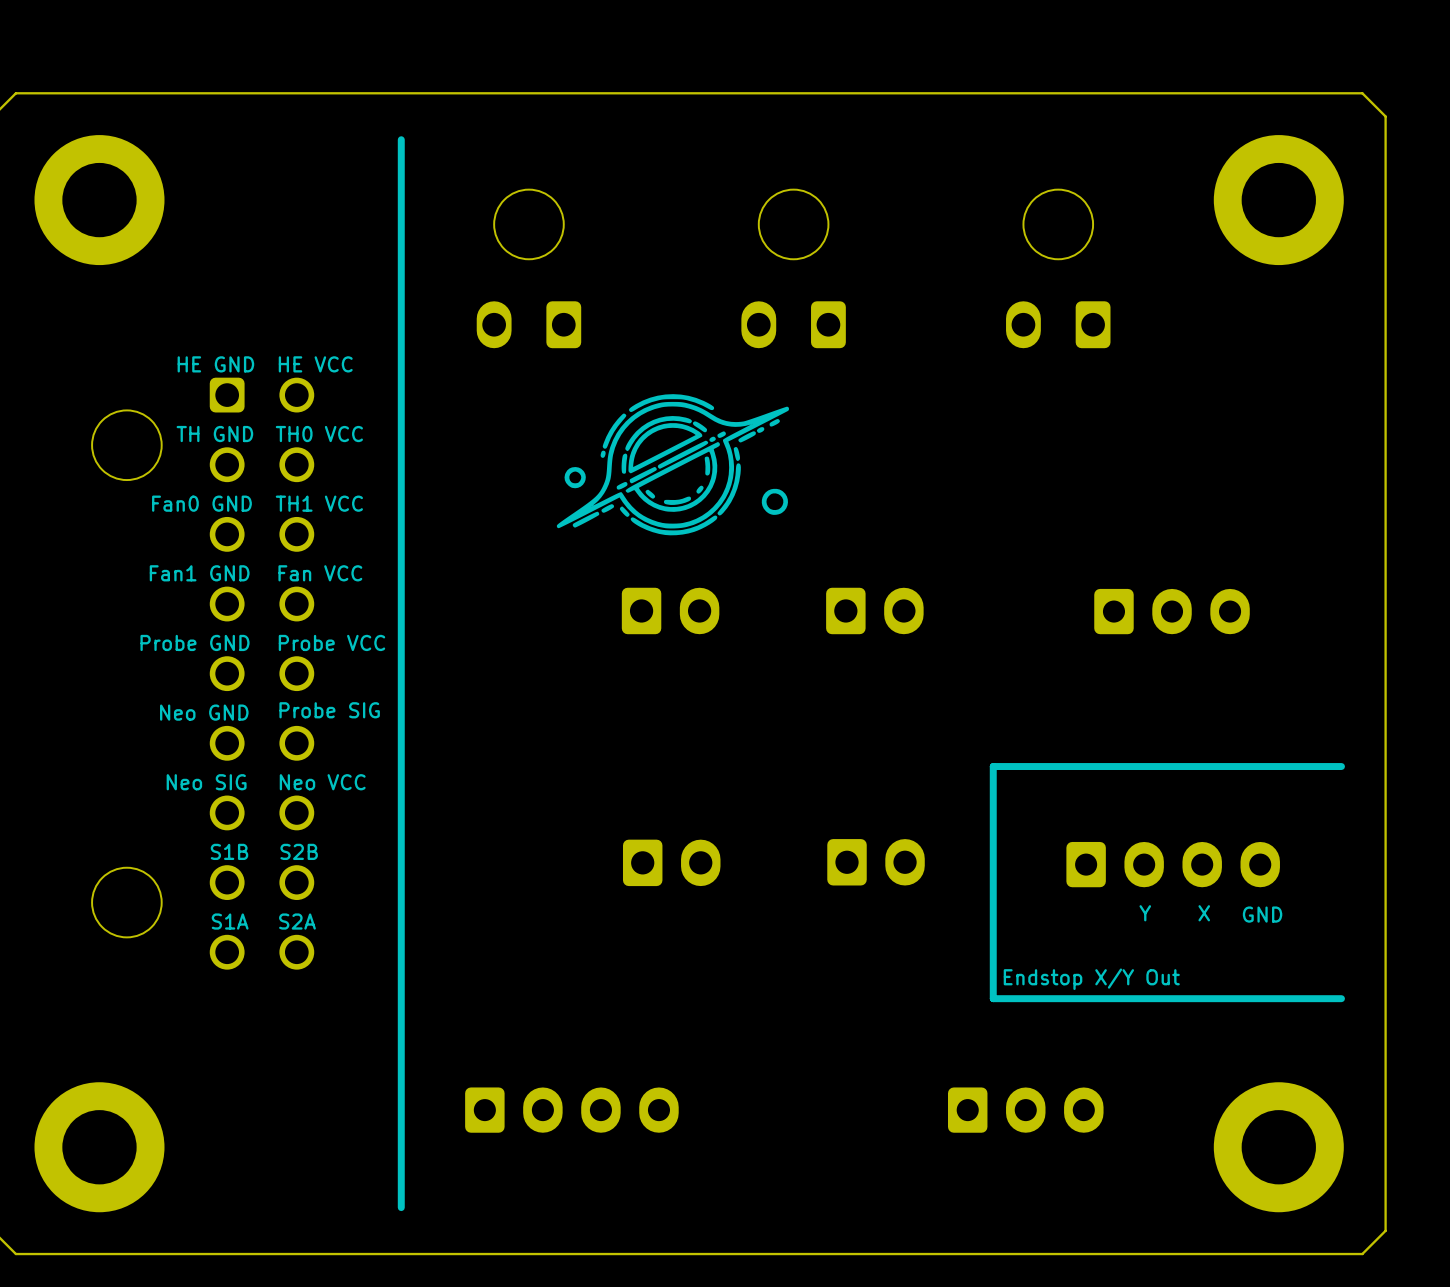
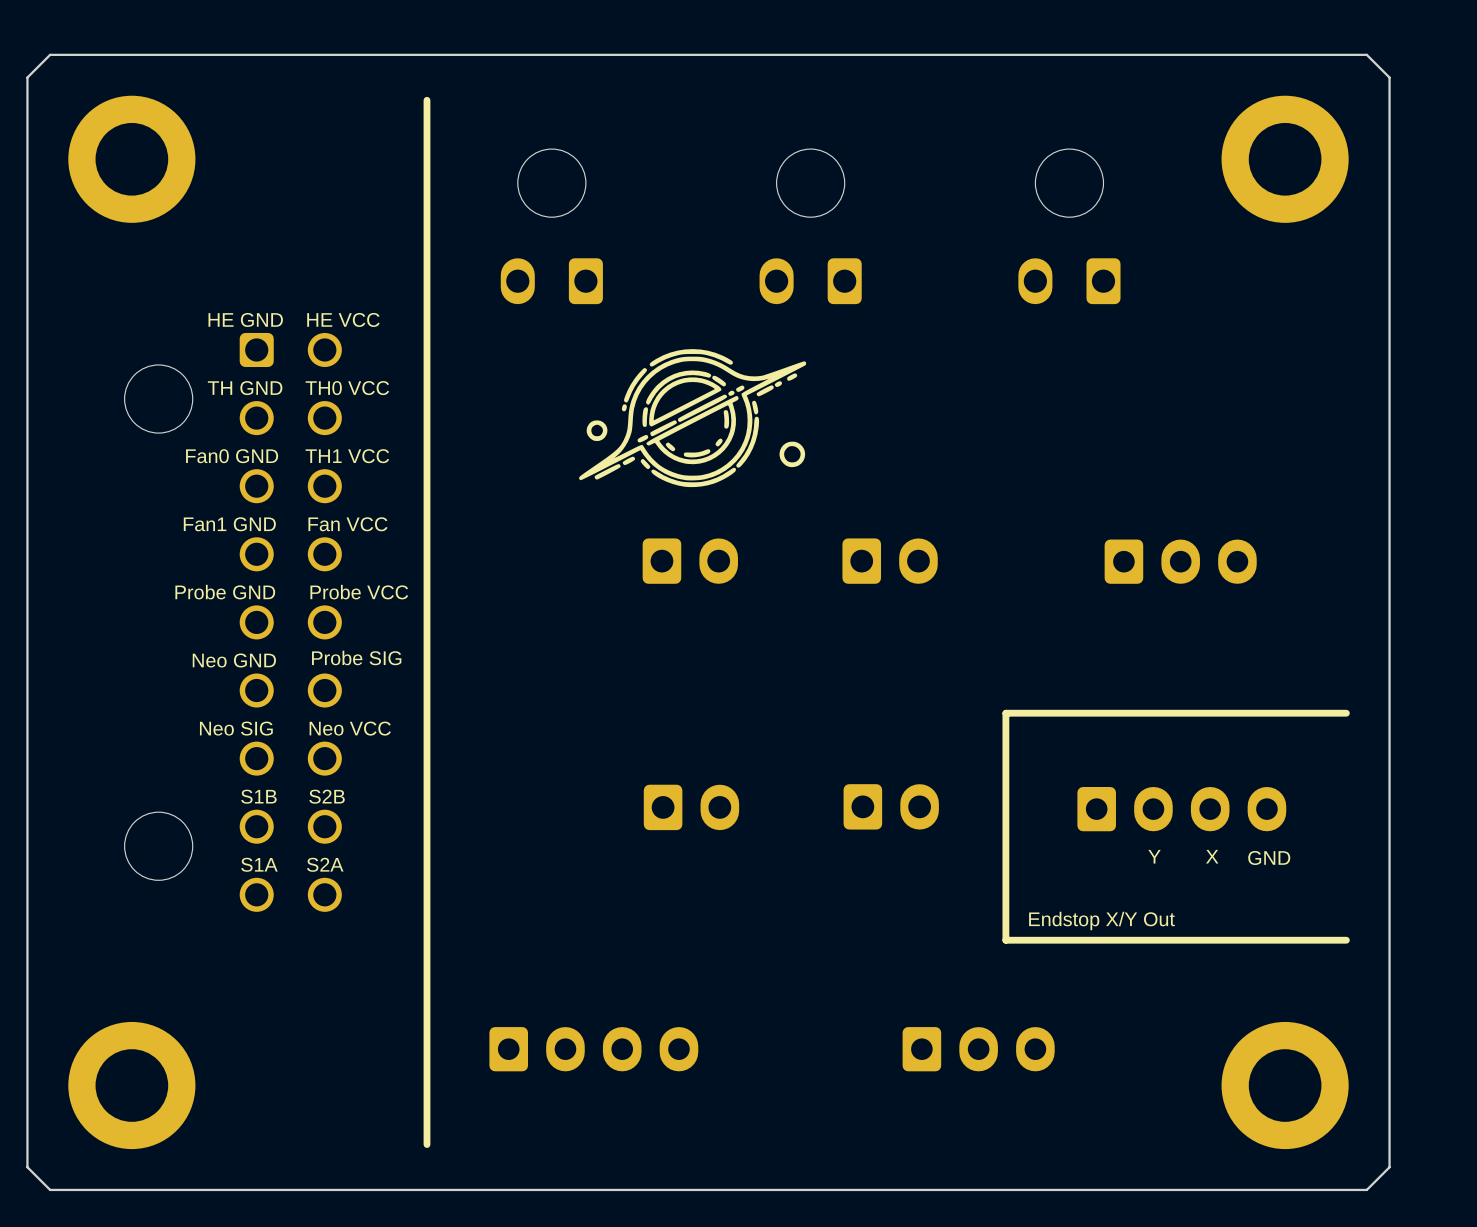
part position: (1025, 1110) -> (978, 1049)

